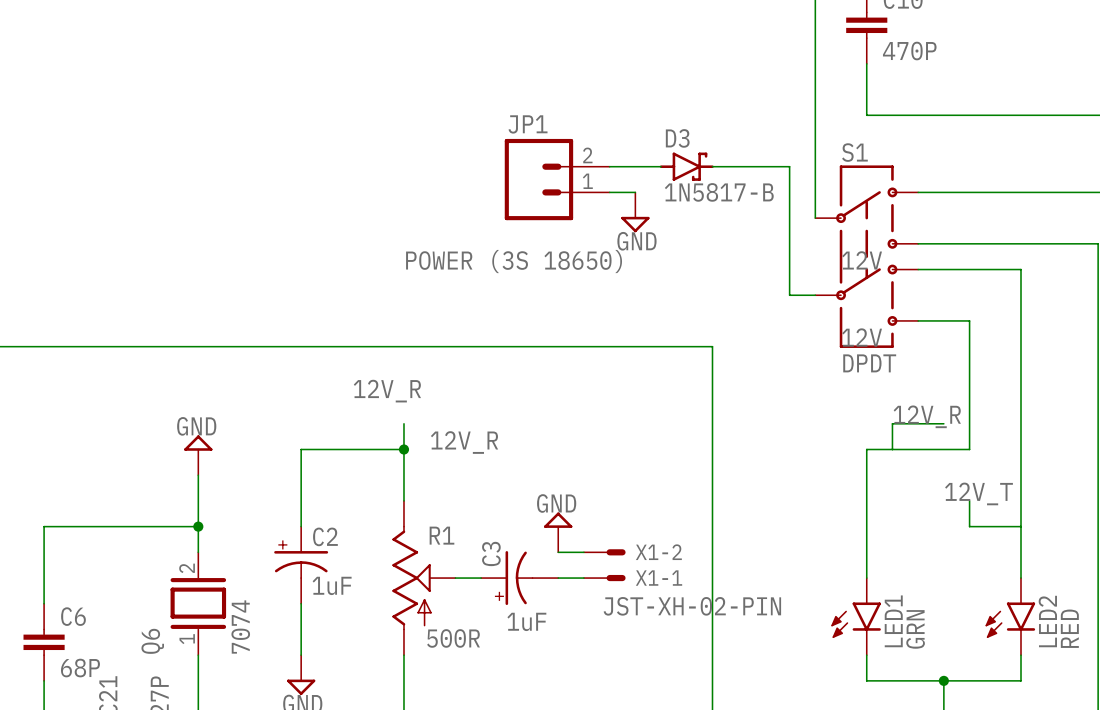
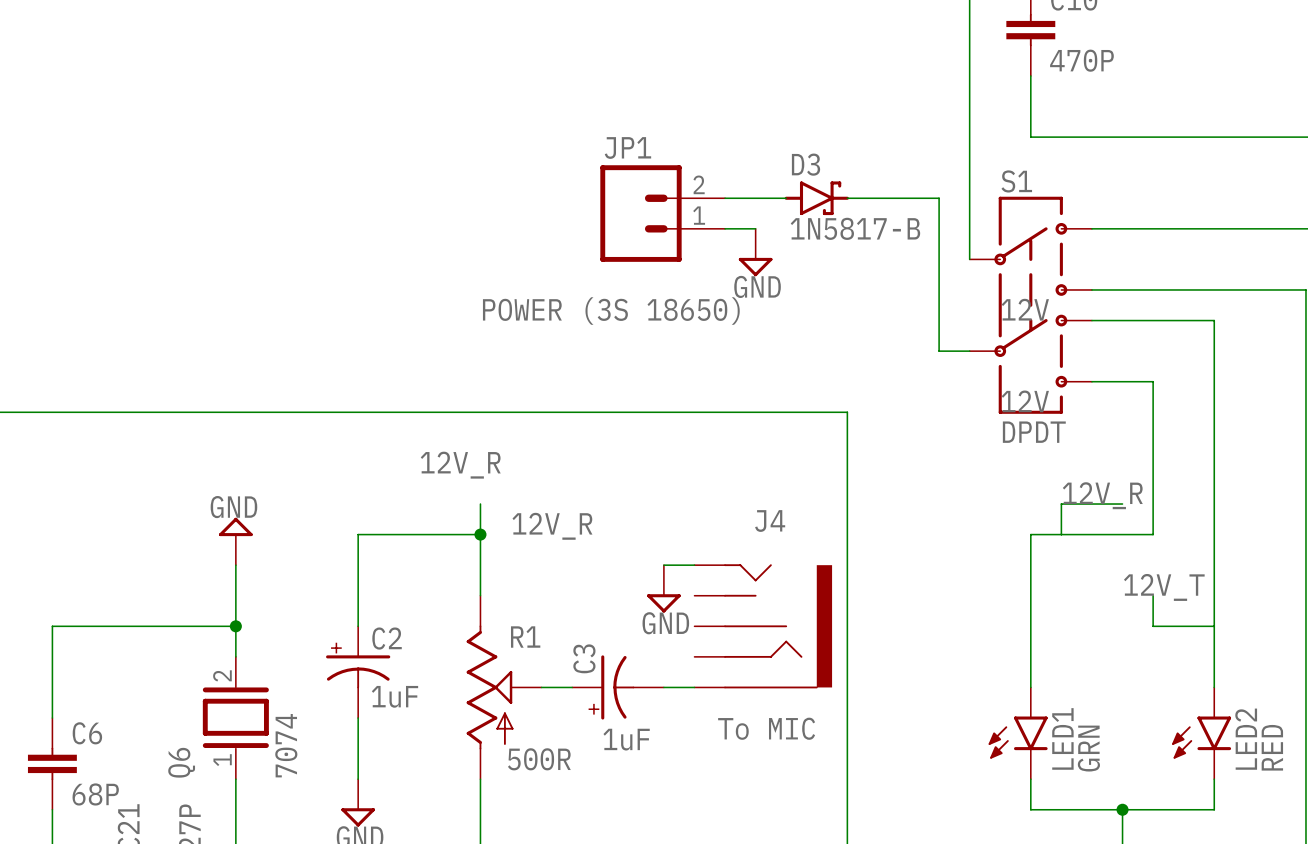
power symbol rotation: 0° (558, 520) -> 180° (663, 603)
J4: none -> To MIC (763, 626)
power symbol position: GND (558, 532) -> GND (663, 588)
wire: (558, 552) (583, 552) -> (663, 565) (694, 565)
X1-2: (604, 552) -> none
X1-1: JST-XH-02-PIN (604, 578) -> none

